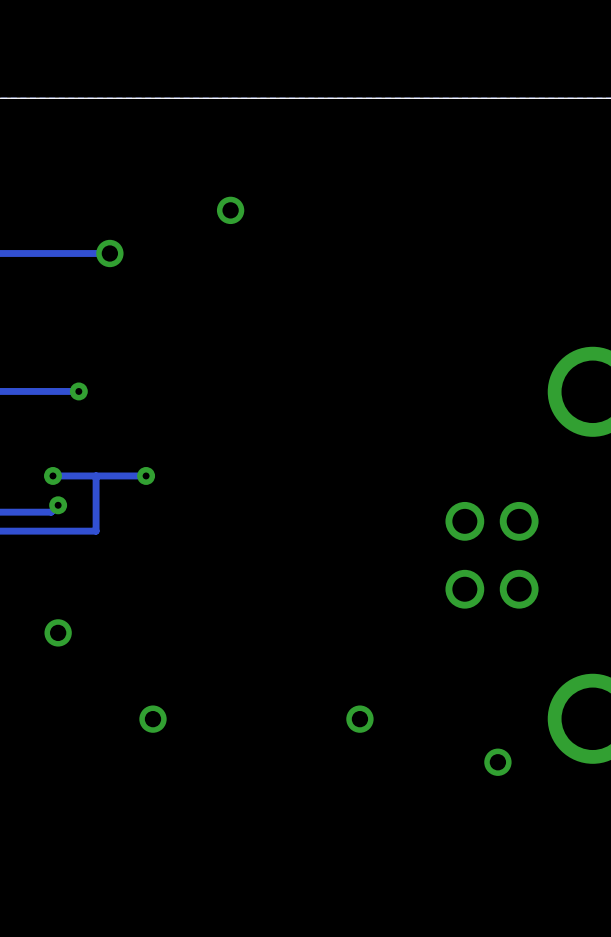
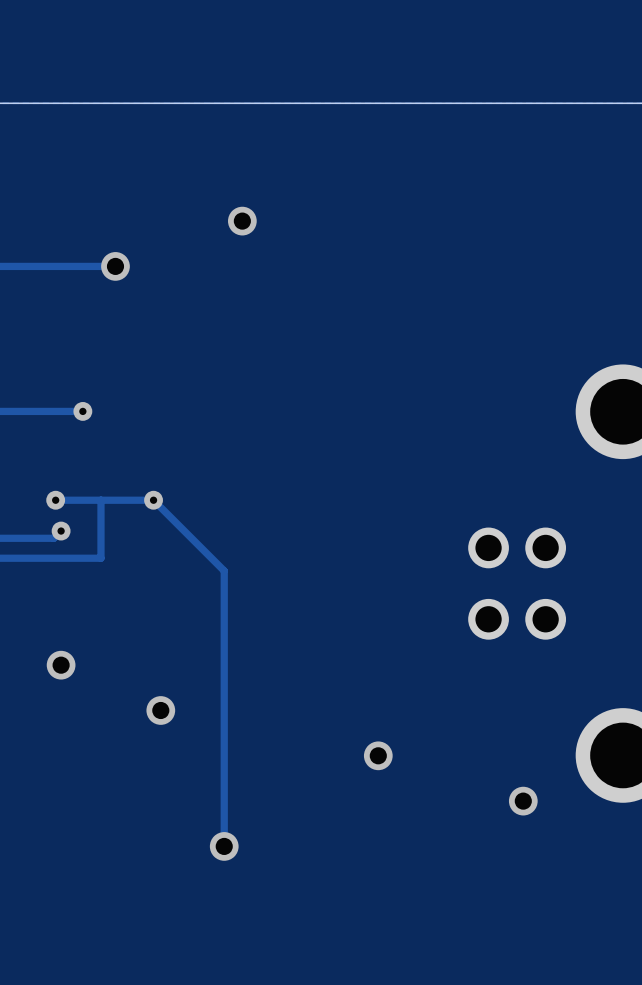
track: none -> (153, 500) (224, 570) (224, 846)
via position: (153, 719) -> (160, 710)
via: none -> (224, 846)

